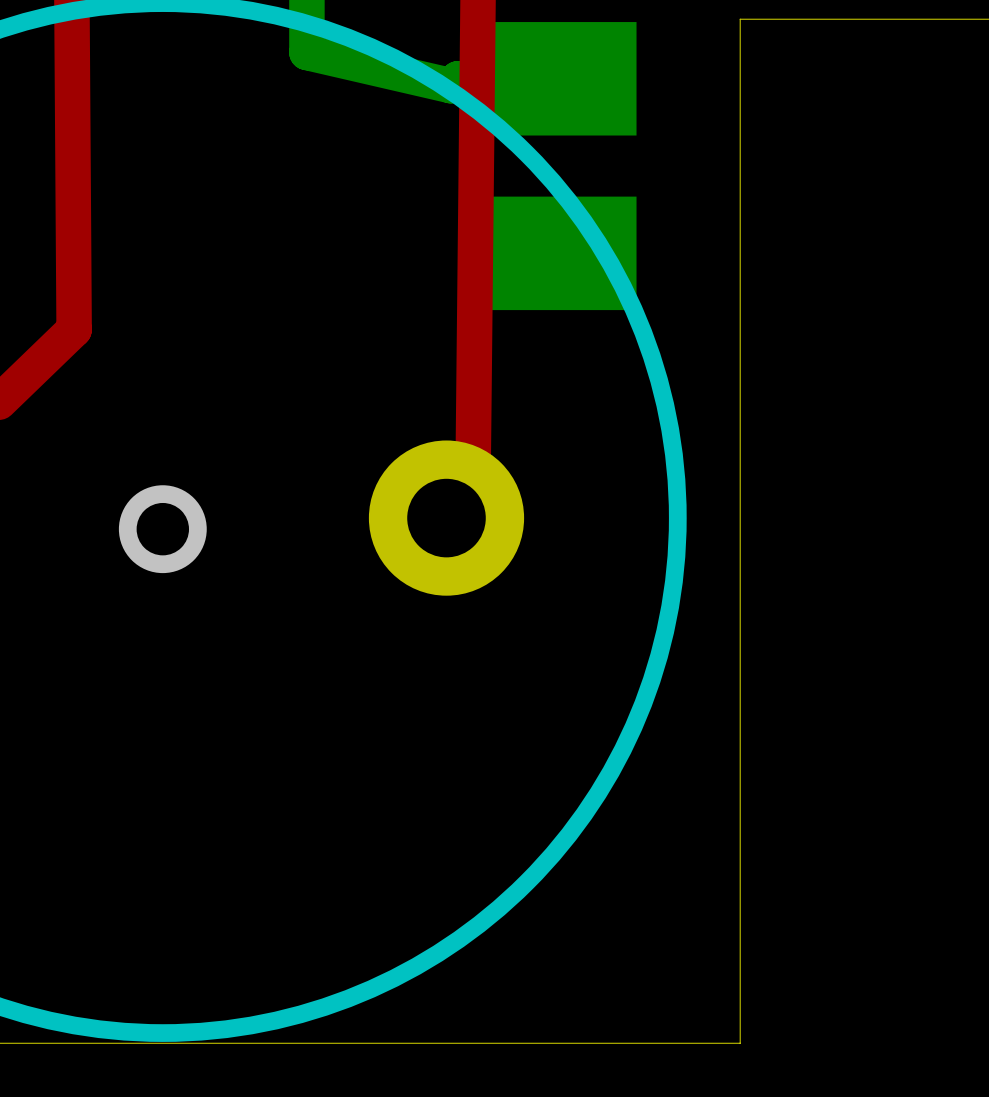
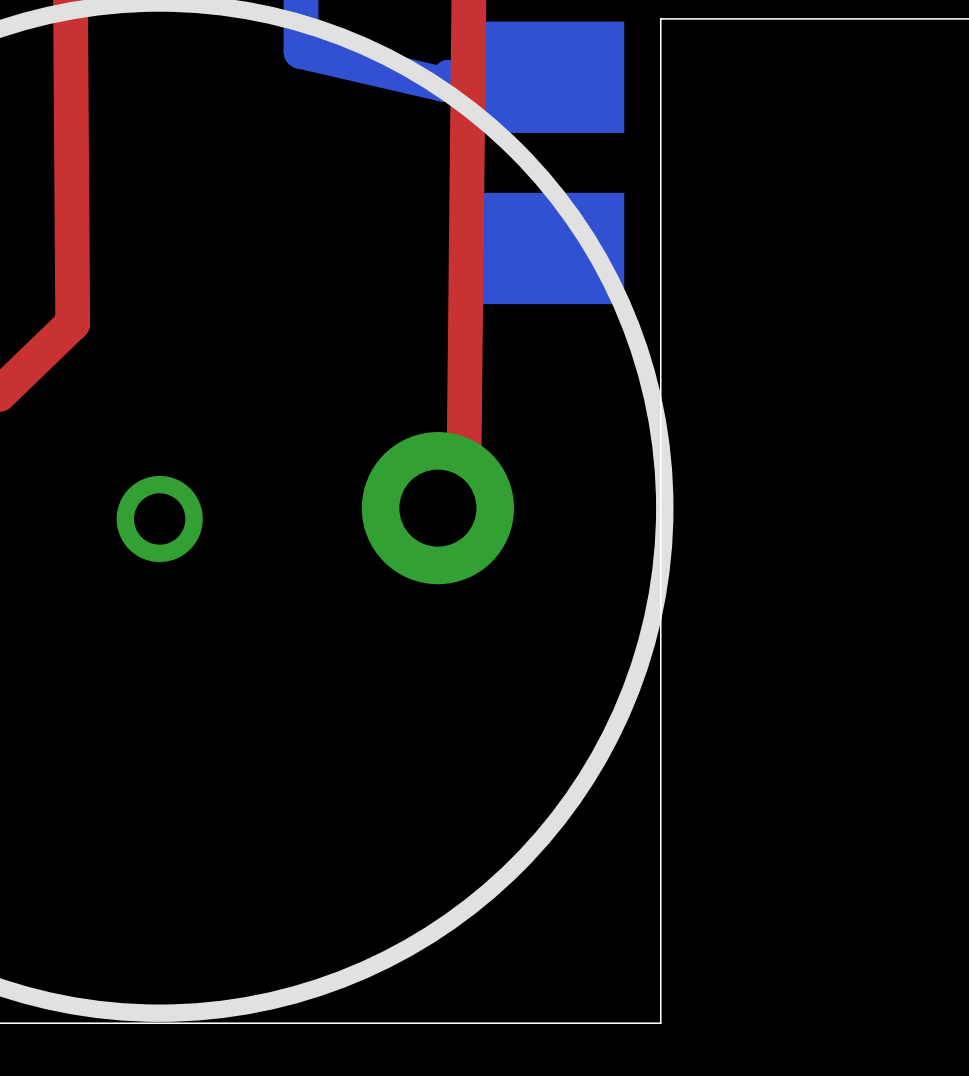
board edge: (740, 19) (740, 1043) (673, 1043) -> (725, 18) (660, 18) (660, 1023)

